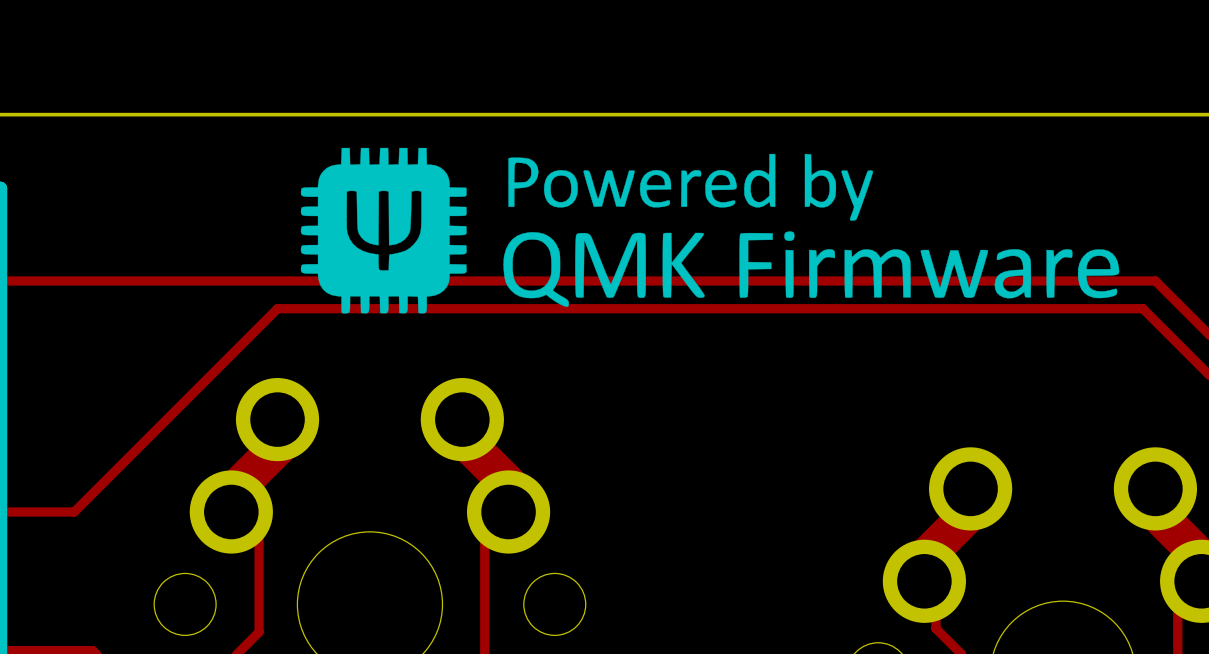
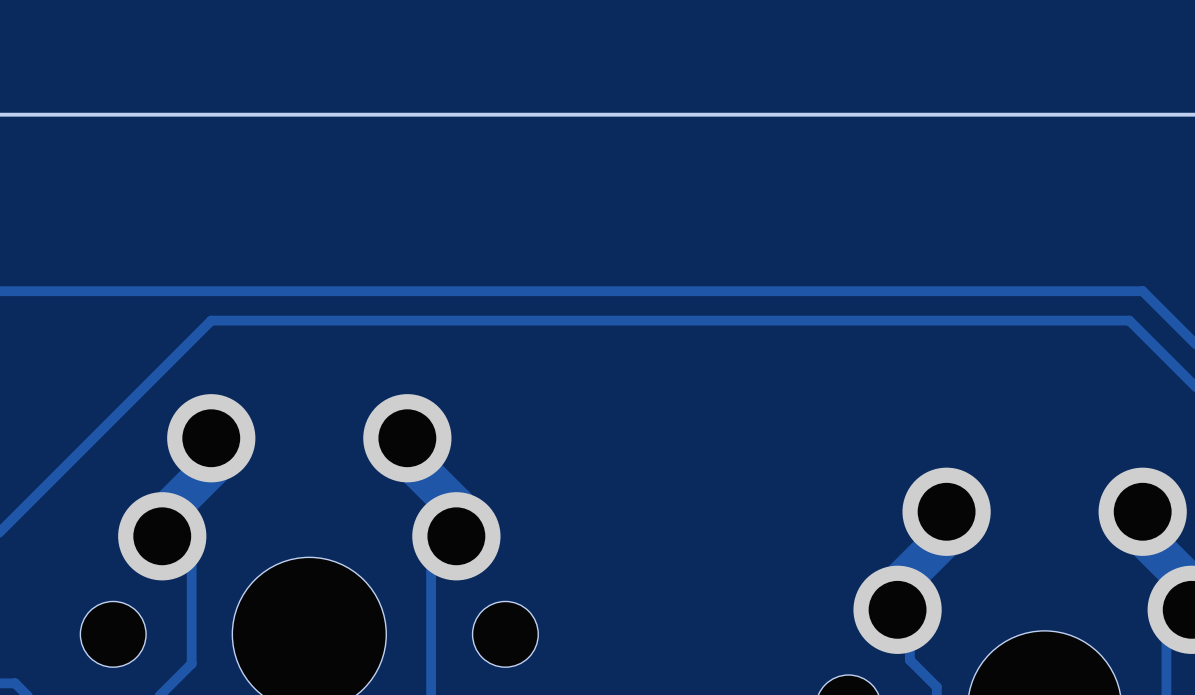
drawing: [300, 147, 1120, 314] -> none

